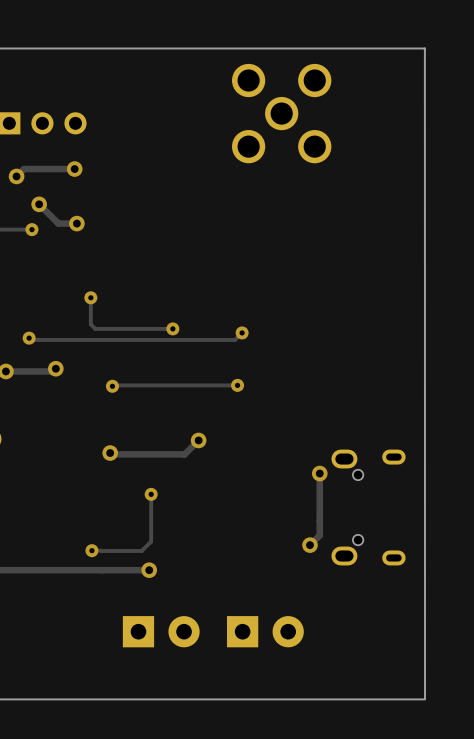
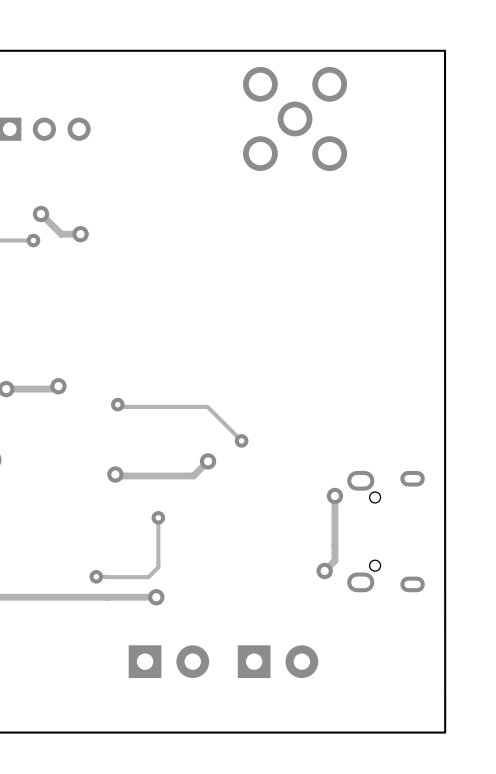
track: (74, 169) (23, 169) (16, 176) -> none
via: (74, 169) -> none
via: (16, 176) -> none
track: (90, 297) (90, 324) (95, 328) (172, 328) -> none
via: (90, 297) -> none
via: (172, 328) -> none
track: (242, 332) (235, 339) (30, 339) (29, 338) -> none
via: (242, 332) -> none
via: (29, 338) -> none
track: (237, 385) (112, 386) -> none
via position: (237, 385) -> (241, 440)
track: none -> (121, 406) (207, 406) (241, 440)

